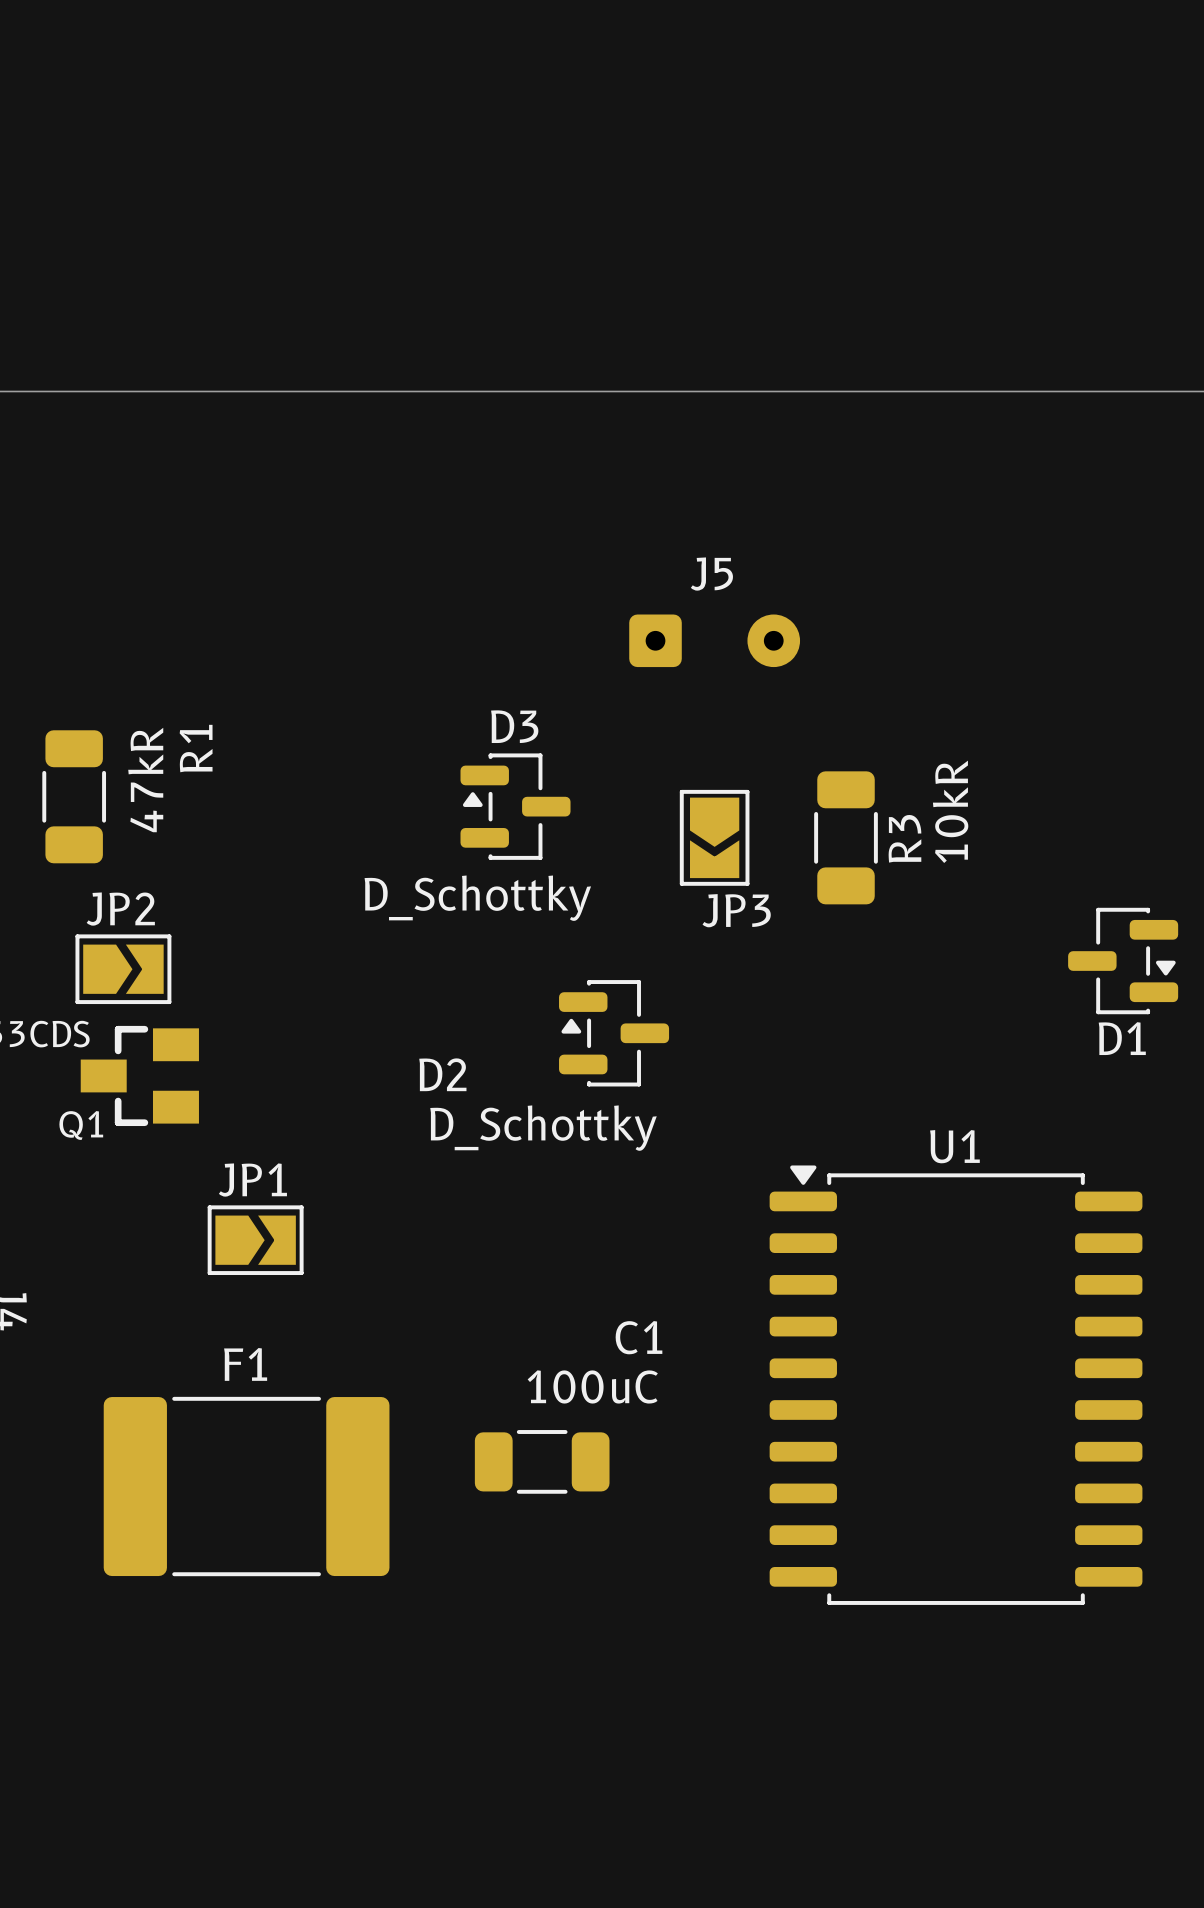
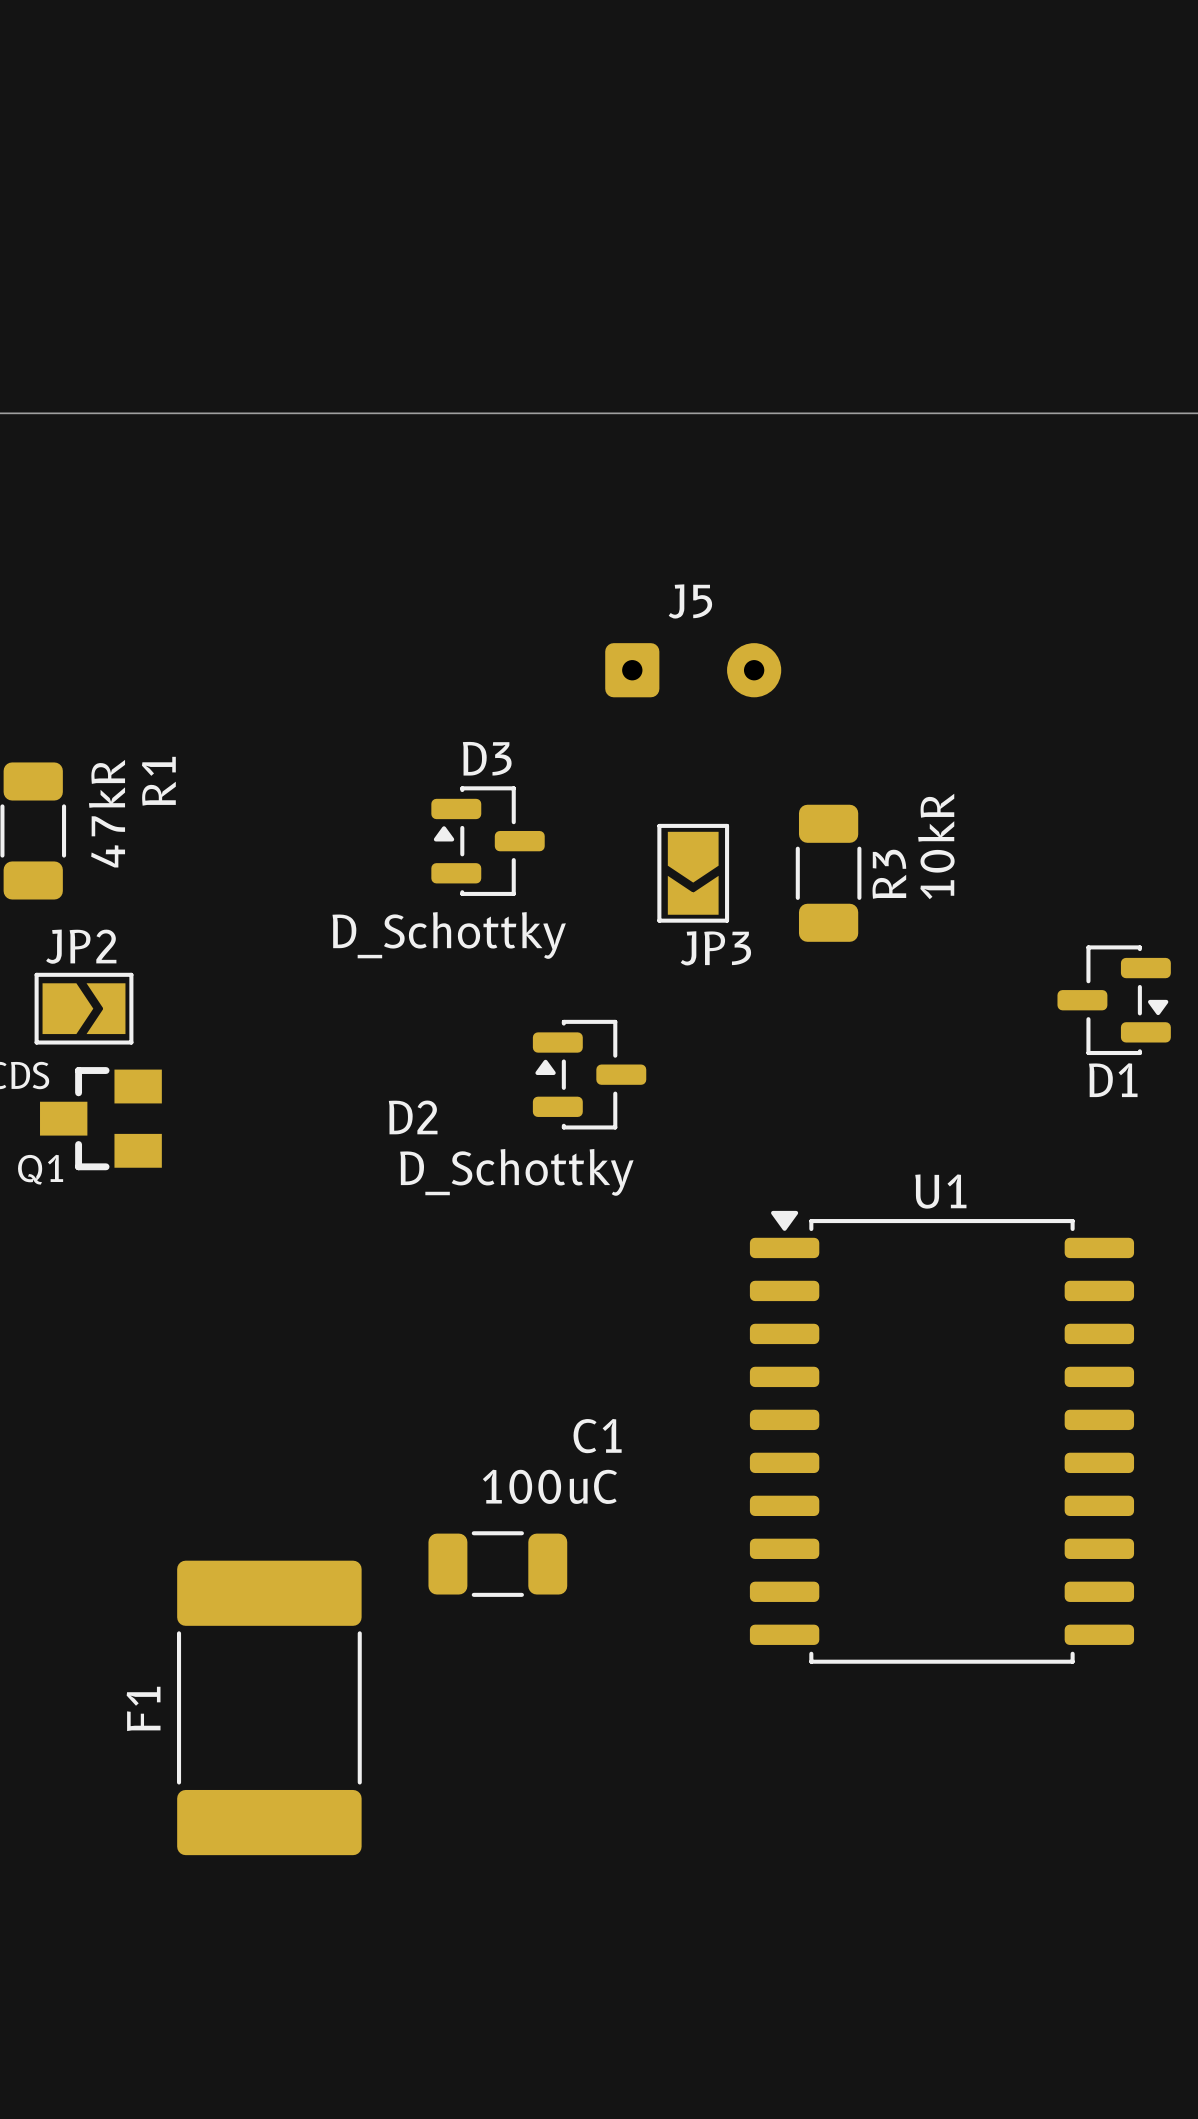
JP1: (255, 1240) -> none
F1 name position: F1 (245, 1364) -> F1 (143, 1708)
C1 position: (542, 1461) -> (497, 1564)
F1 rotation: 0° (246, 1486) -> 90° clockwise (269, 1707)

